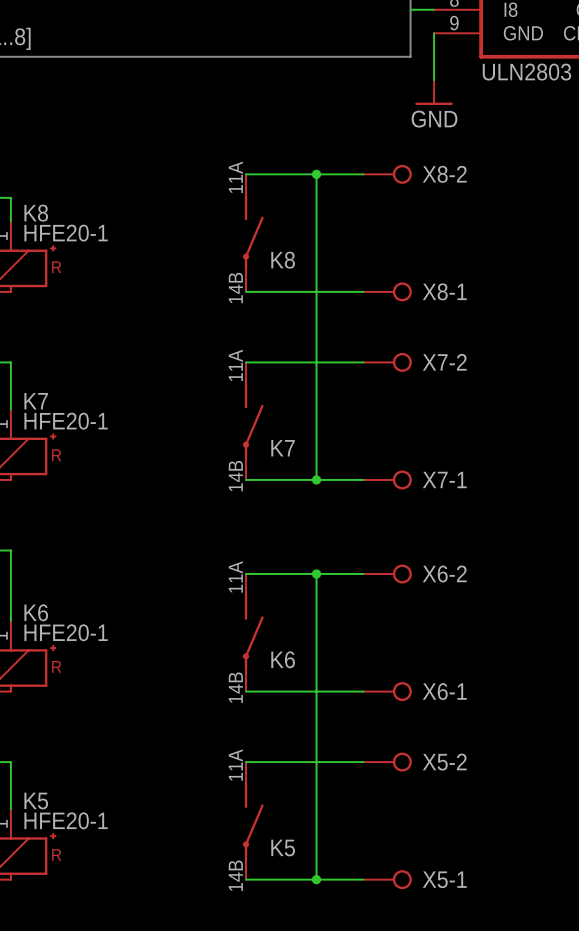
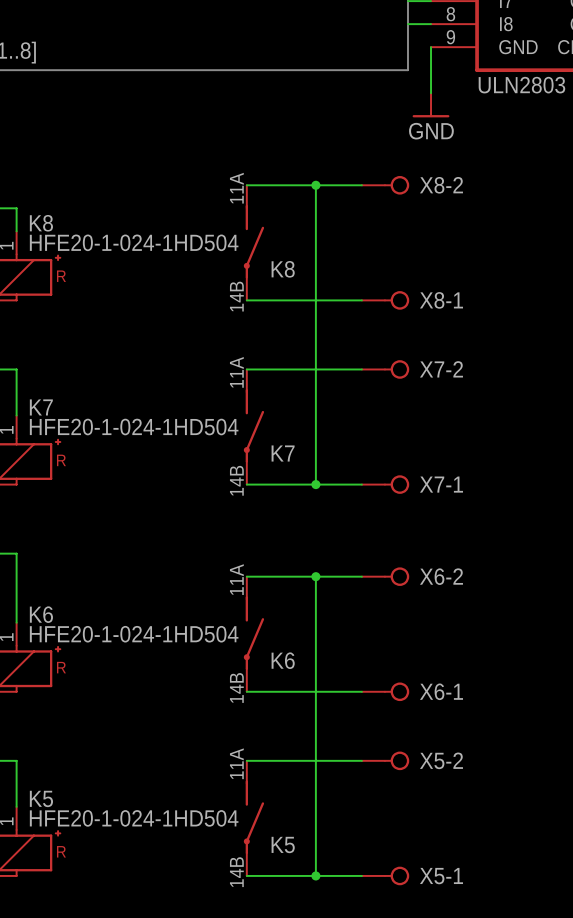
K8 value: HFE20-1 (66, 233) -> HFE20-1-024-1HD504 (134, 242)
K7 value: HFE20-1 (66, 421) -> HFE20-1-024-1HD504 (134, 427)
K6 value: HFE20-1 (66, 632) -> HFE20-1-024-1HD504 (134, 634)
K5 value: HFE20-1 (66, 820) -> HFE20-1-024-1HD504 (134, 818)

